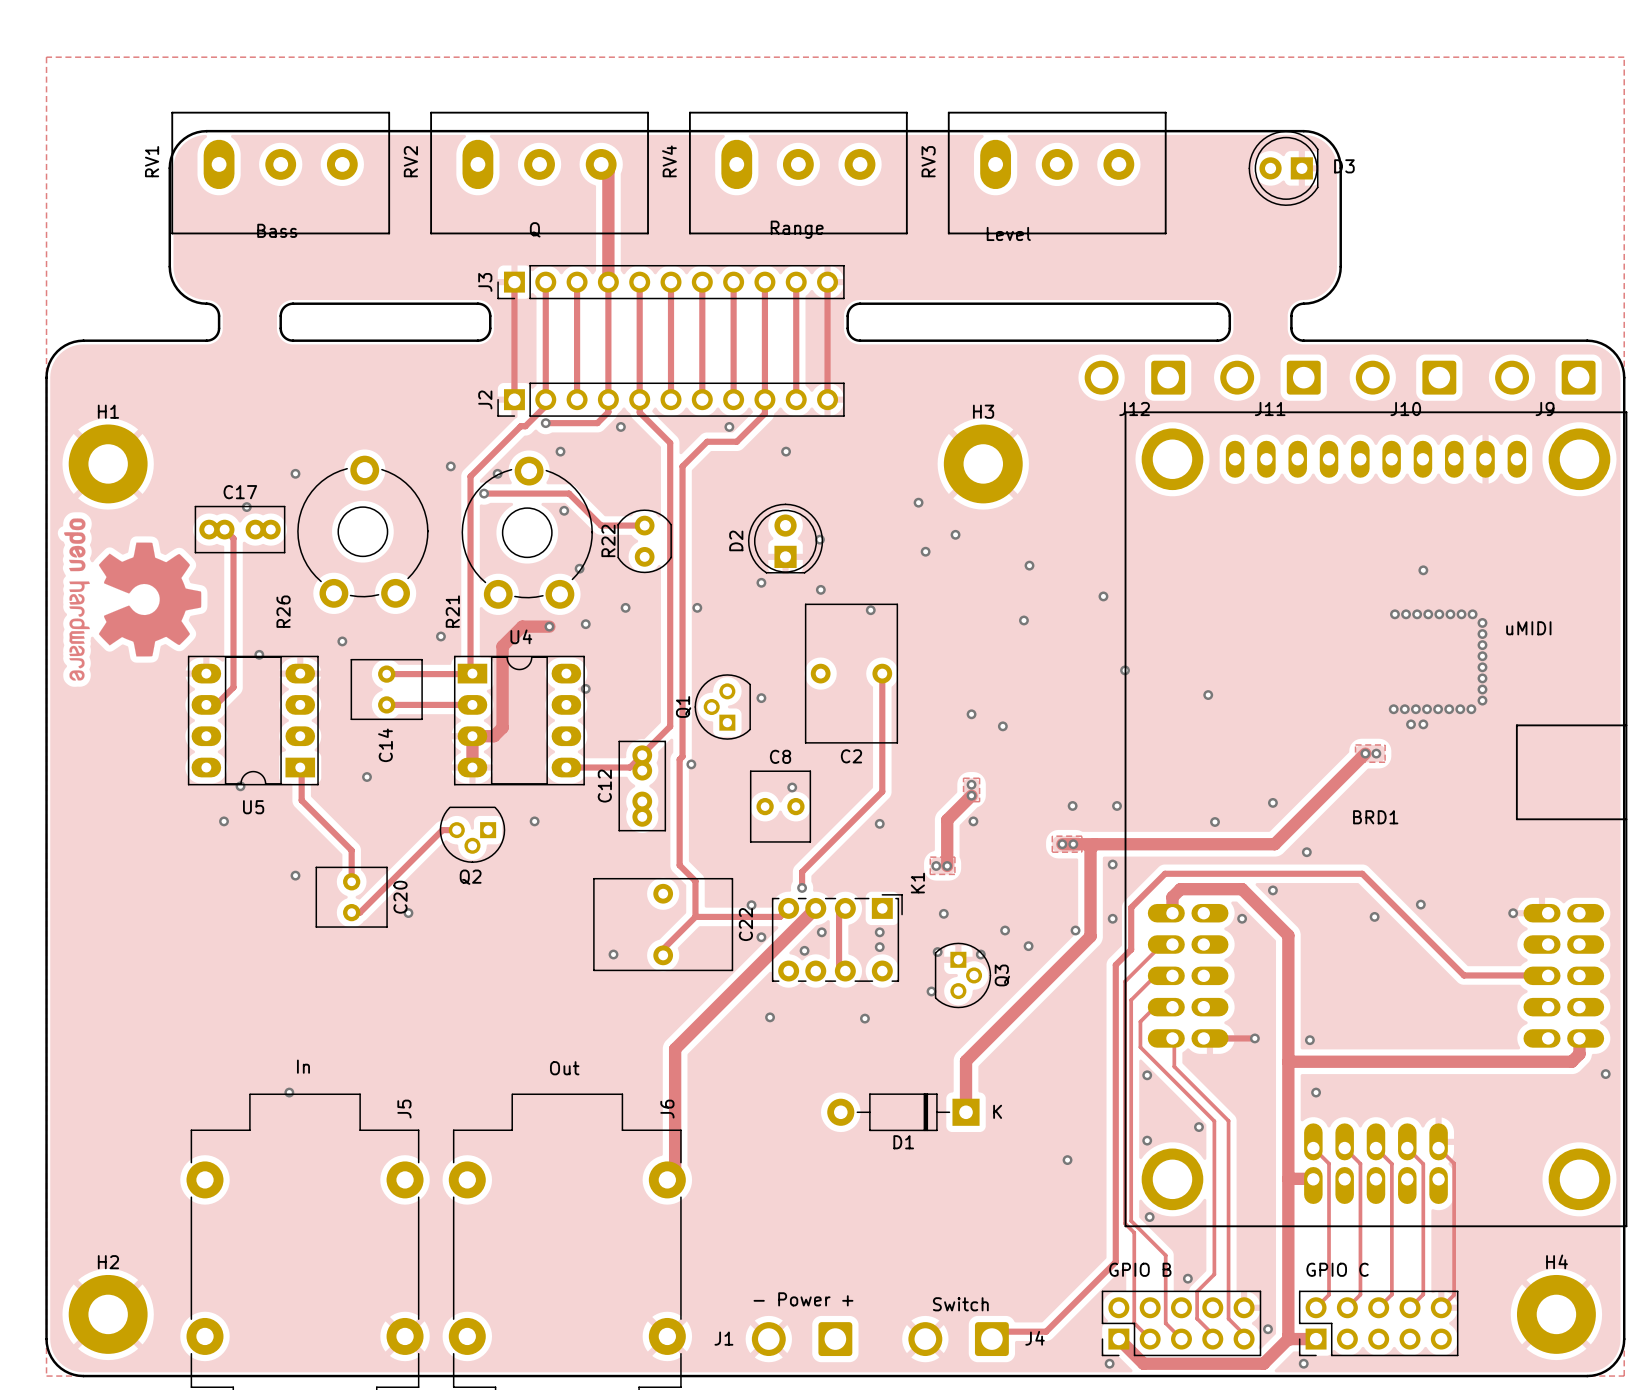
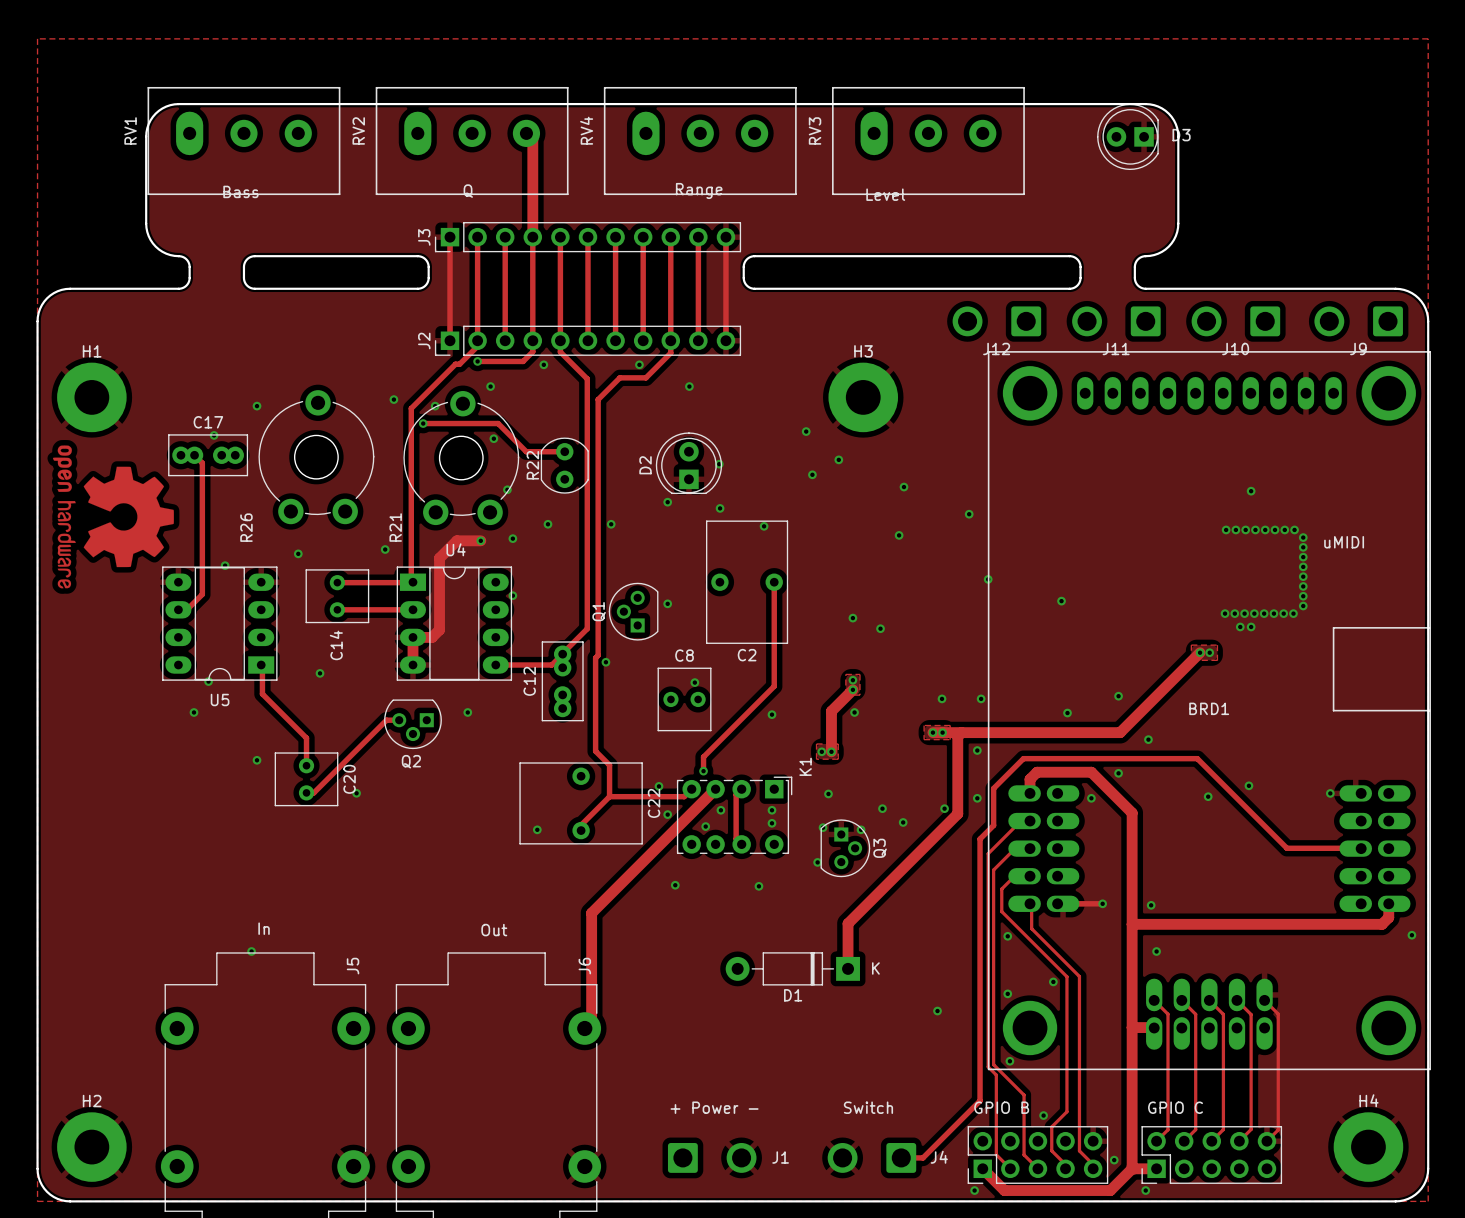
text: none -> + Power - (714, 1107)
text: - Power + (803, 1299) -> none
text position: Switch (960, 1304) -> Switch (868, 1107)
track: (1051, 1326) (1046, 1331) (999, 1331) (991, 1339) -> (923, 1157) (914, 1157)
J1 rotation: 0° (802, 1339) -> 180° (712, 1157)
J4 position: (958, 1339) -> (871, 1157)

